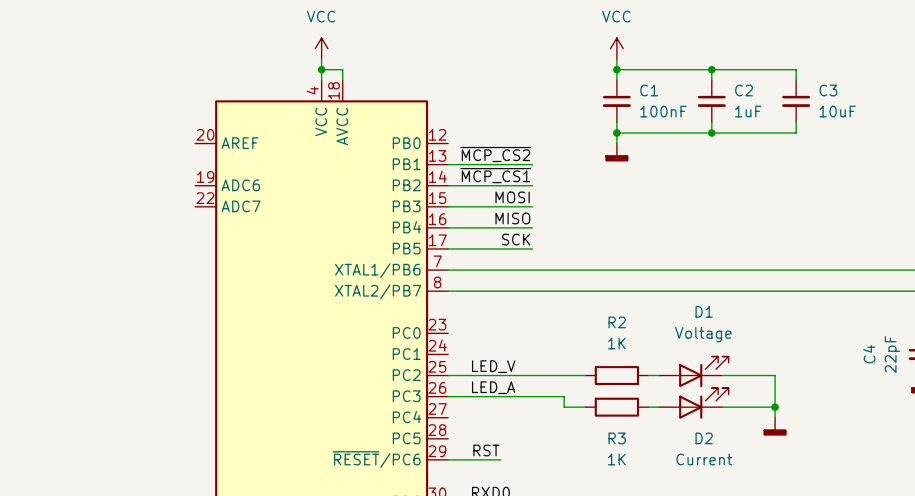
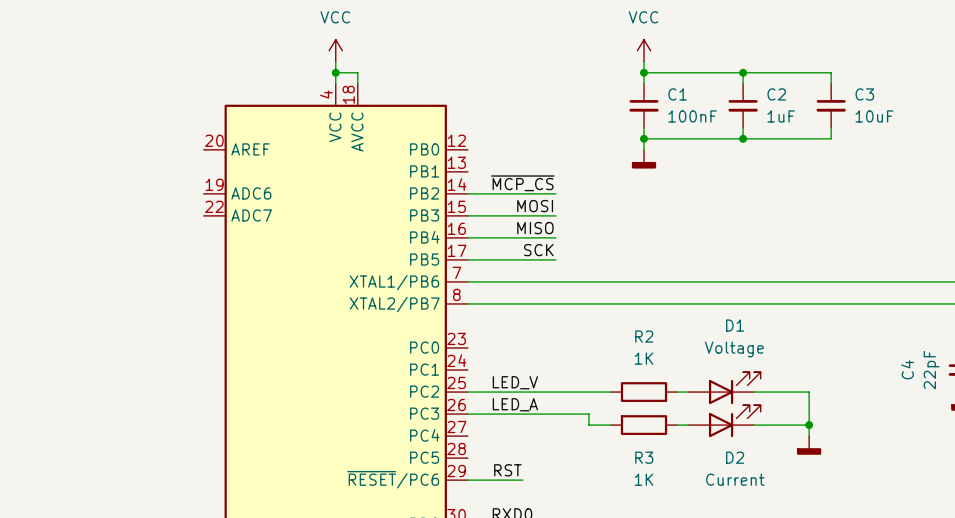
label: ~{MCP_CS2} (495, 154) -> none
wire: (448, 164) (532, 164) -> none
label: ~{MCP_CS1} (495, 175) -> ~{MCP_CS} (522, 183)

